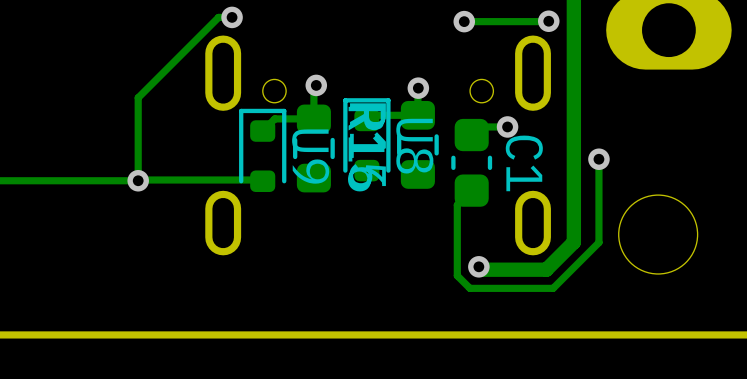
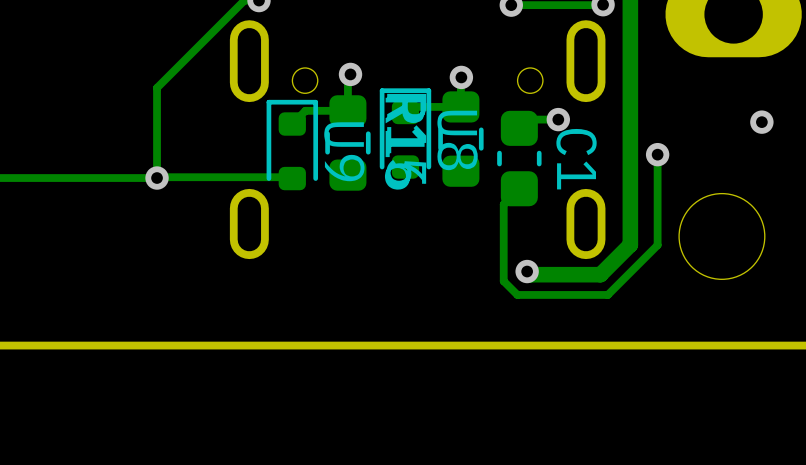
via: none -> (761, 122)

